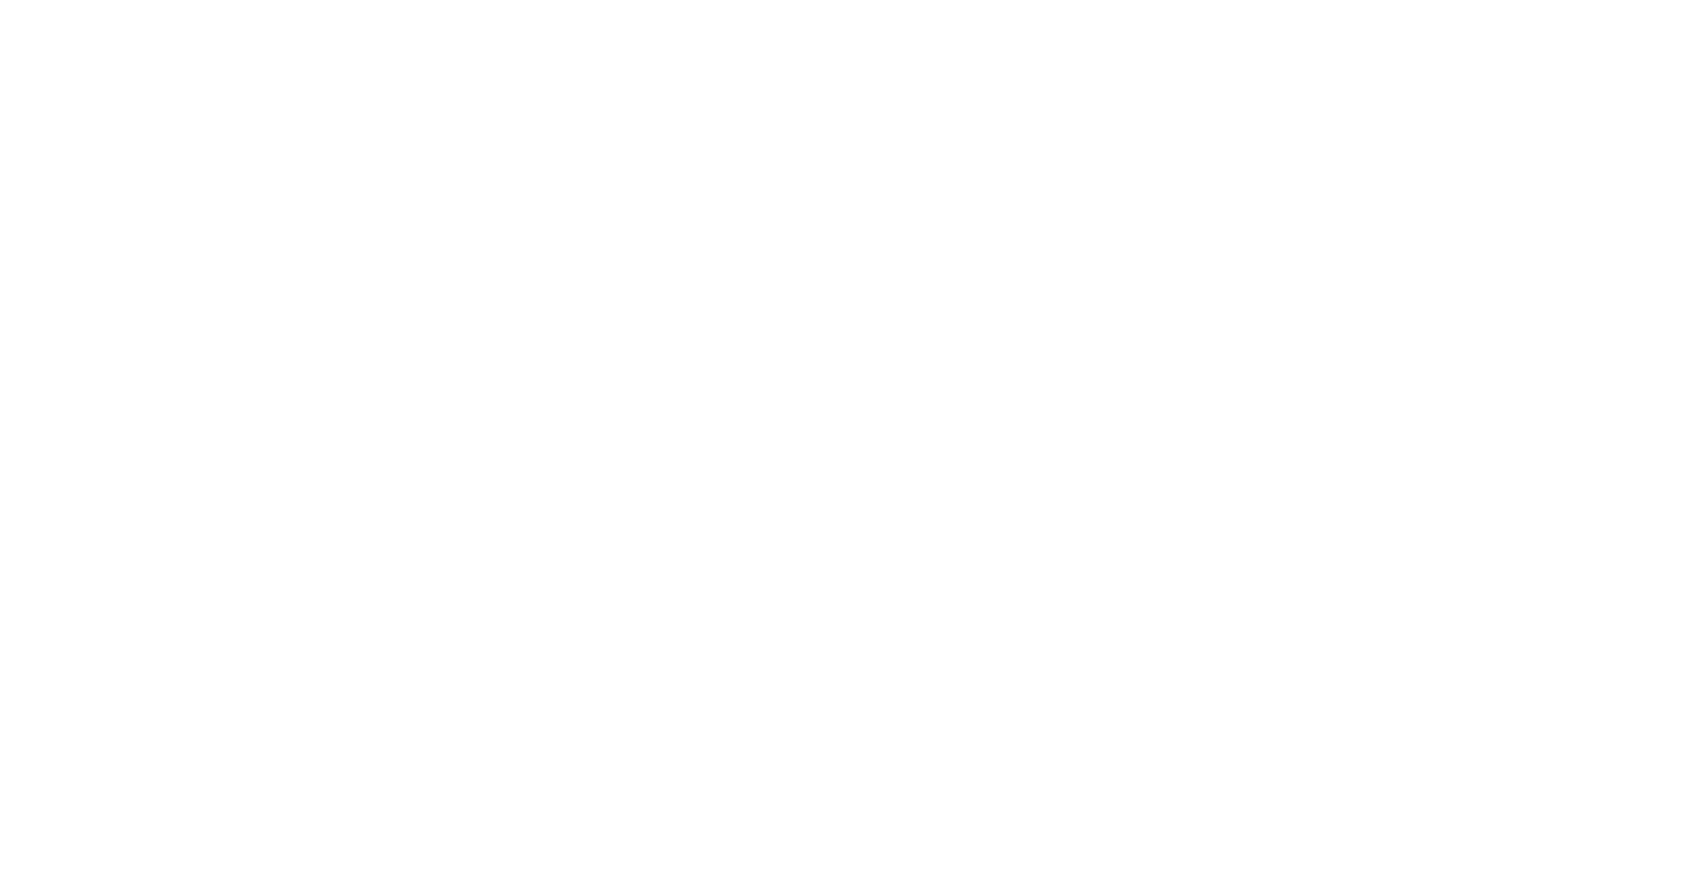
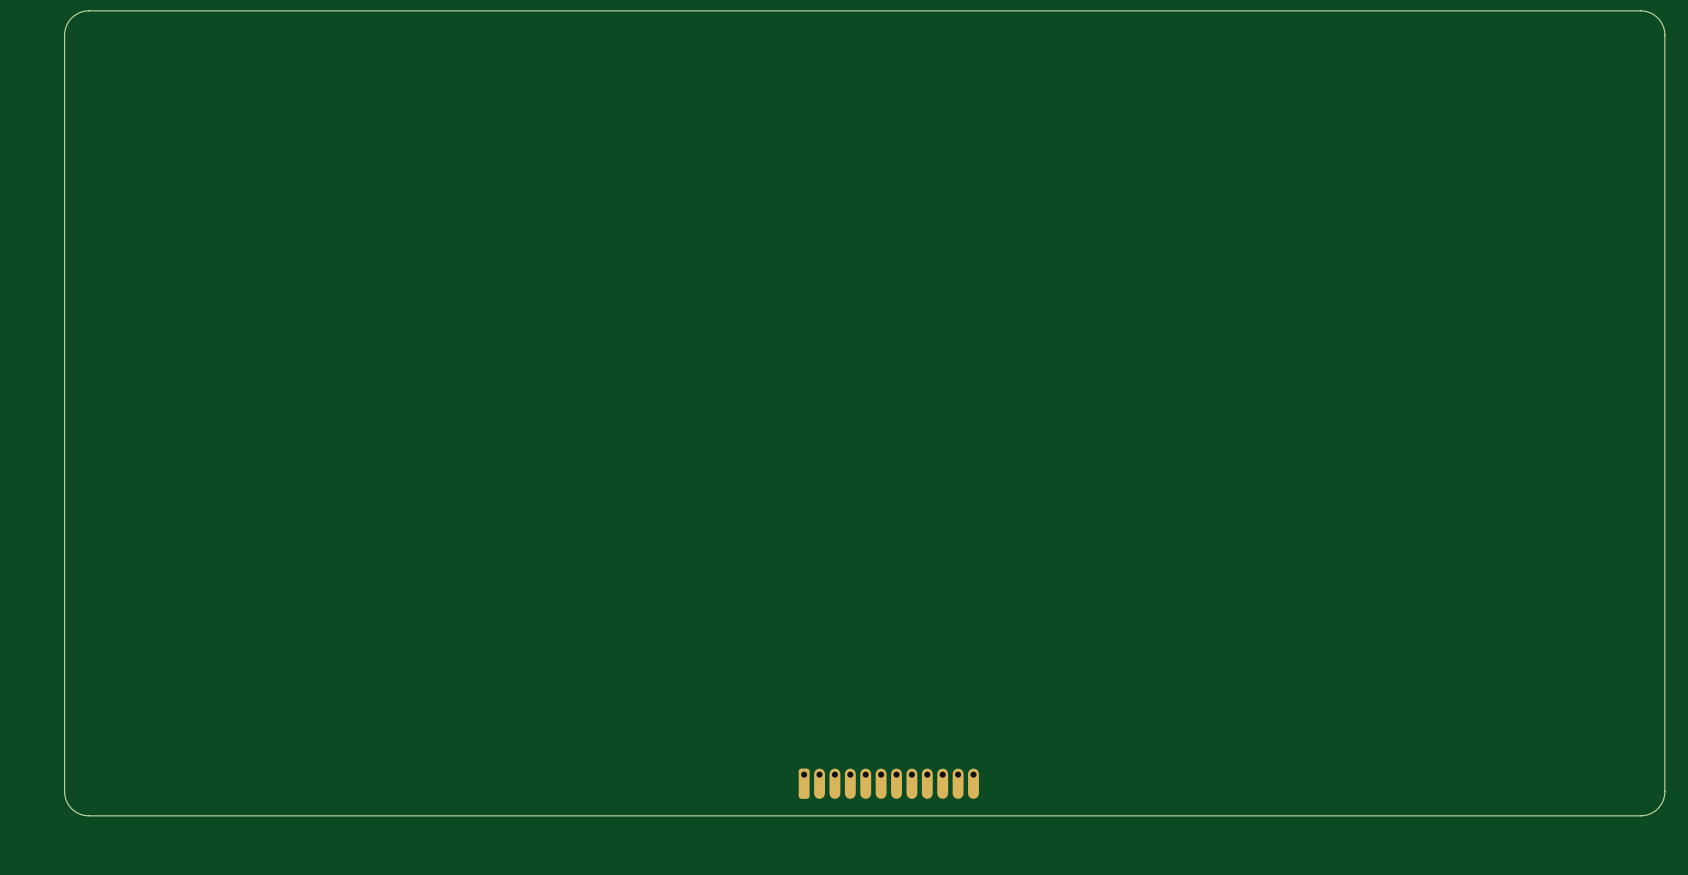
board edge: none -> (1640, 10) (88, 10) (78, 13) (68, 22) (64, 35) (64, 791) (67, 802) (75, 812) (88, 815) (1640, 815) (1651, 813) (1661, 804) (1664, 791) (1664, 35) (1663, 27) (1657, 17) (1648, 12) (1640, 10)
part: none -> (888, 783)

